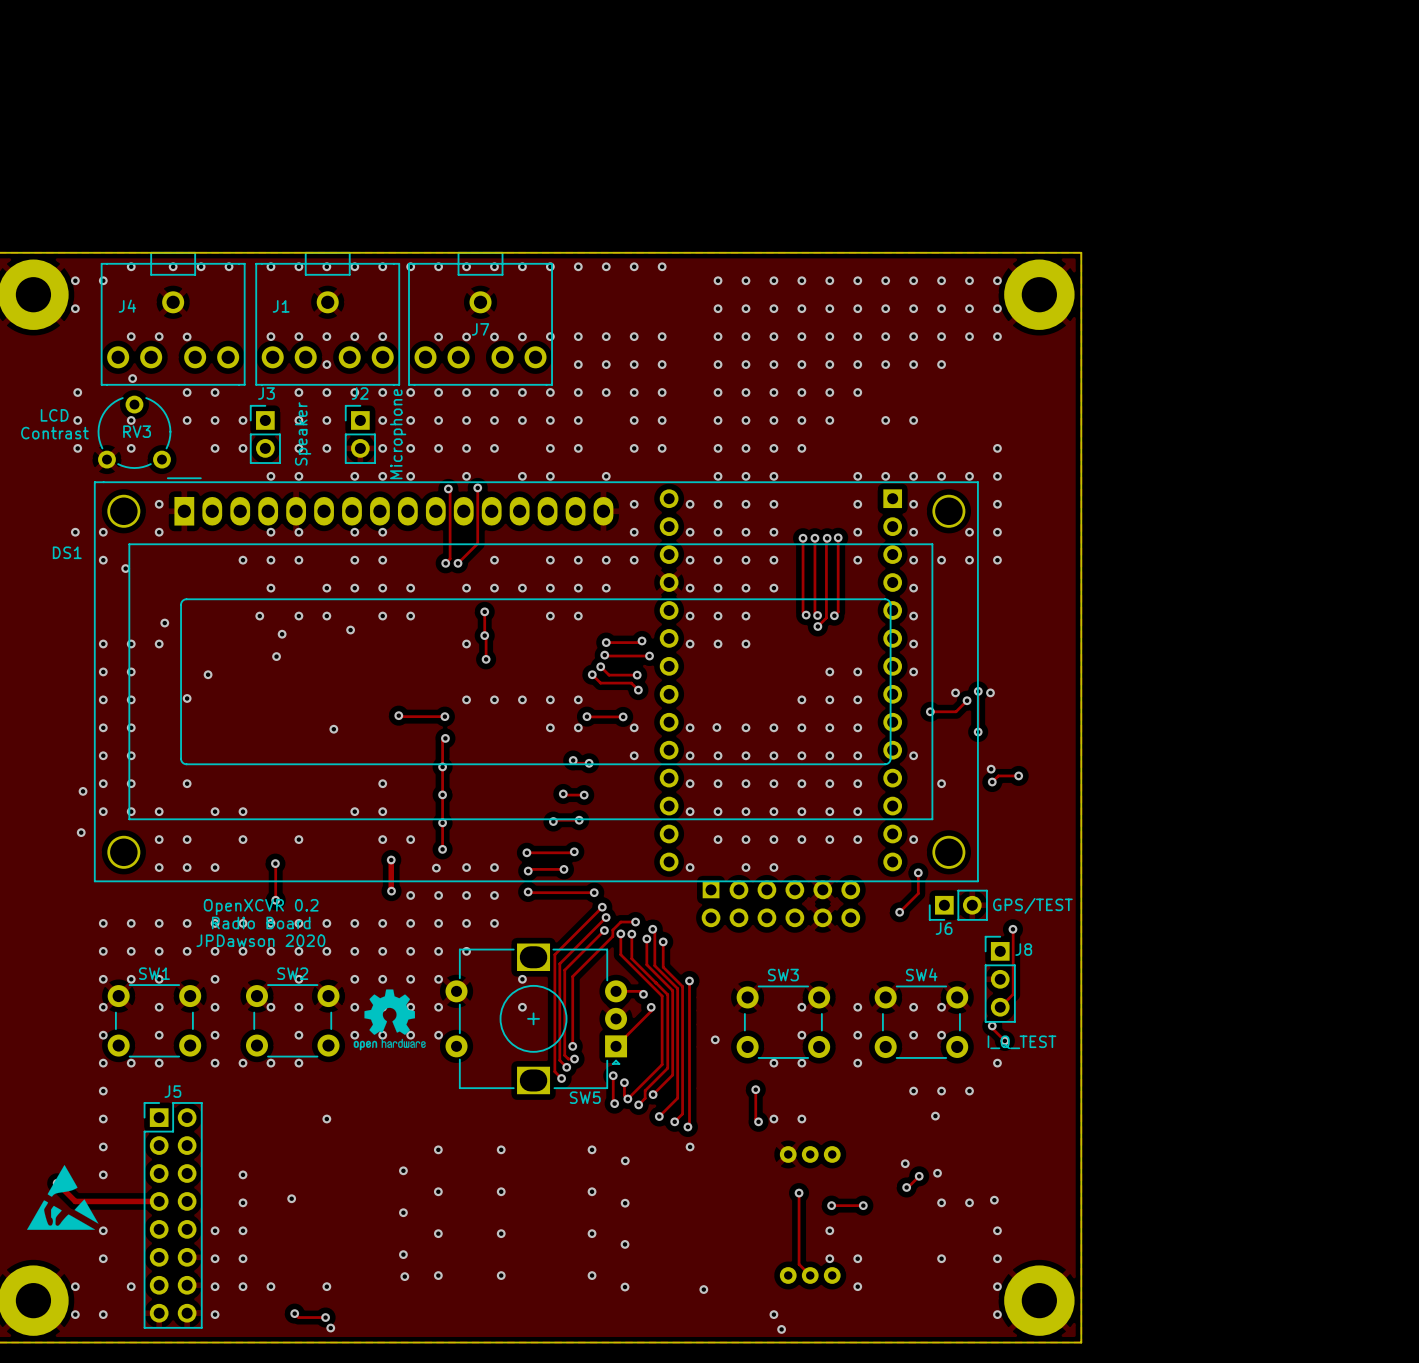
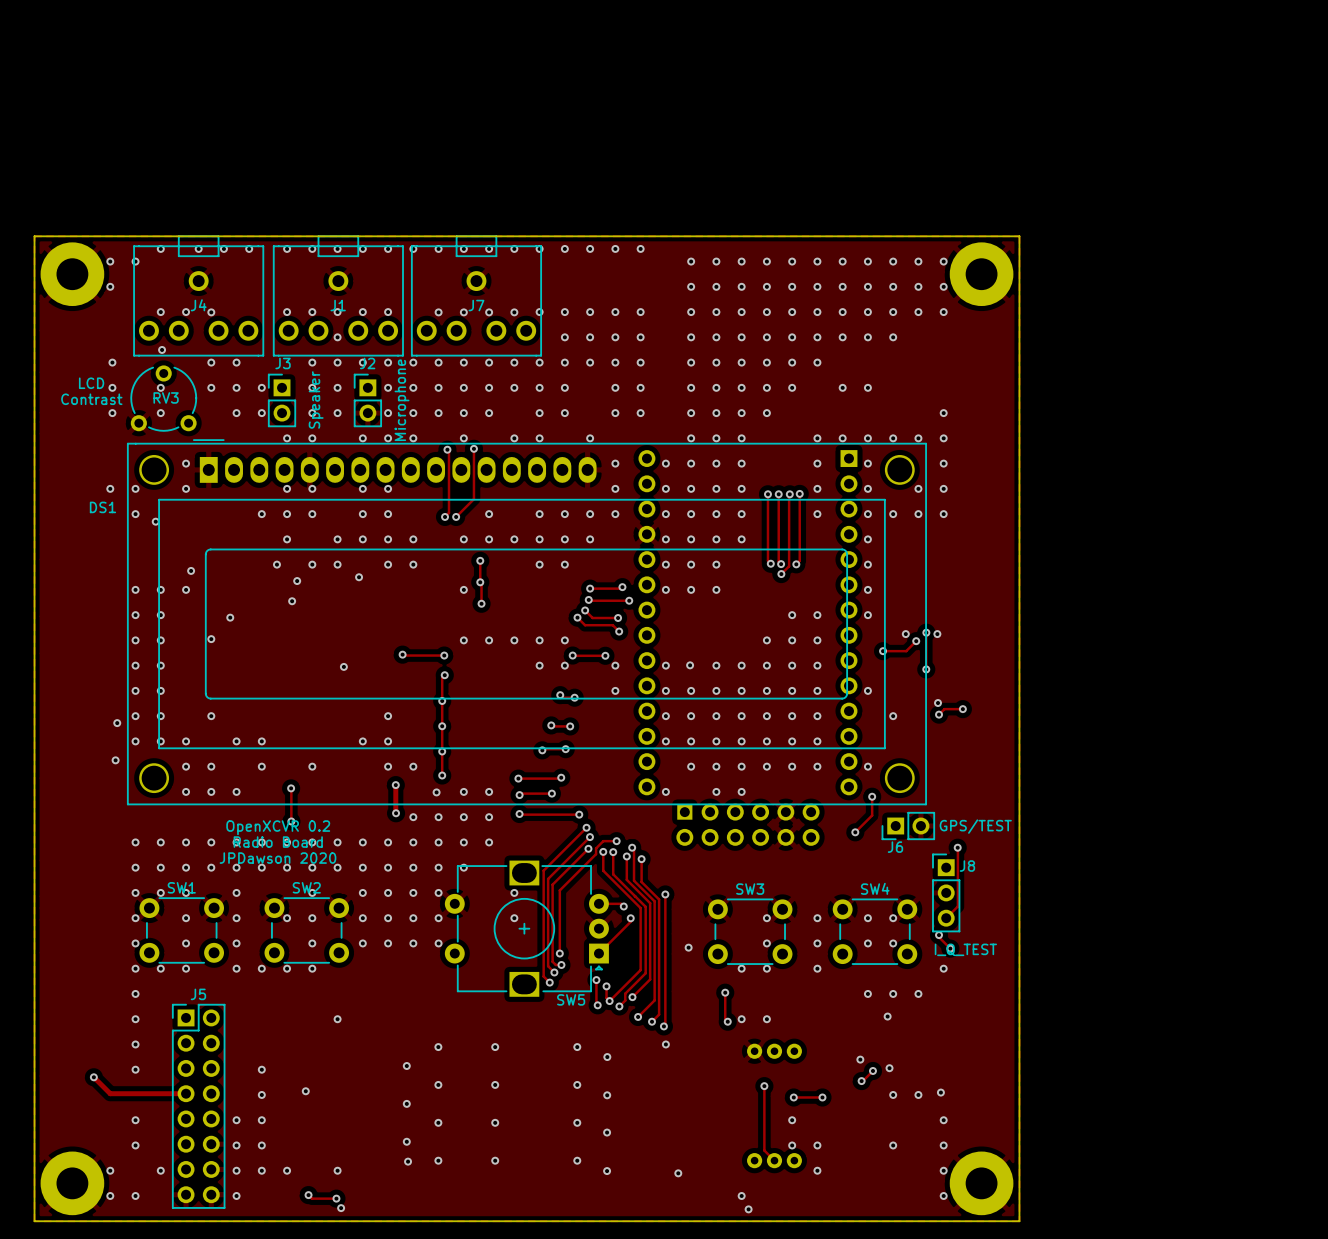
J4 name position: J4 (127, 306) -> J4 (198, 305)
J1 name position: J1 (281, 306) -> J1 (338, 305)
drawing: [353, 989, 426, 1051] -> none
drawing: [26, 1164, 99, 1230] -> none

